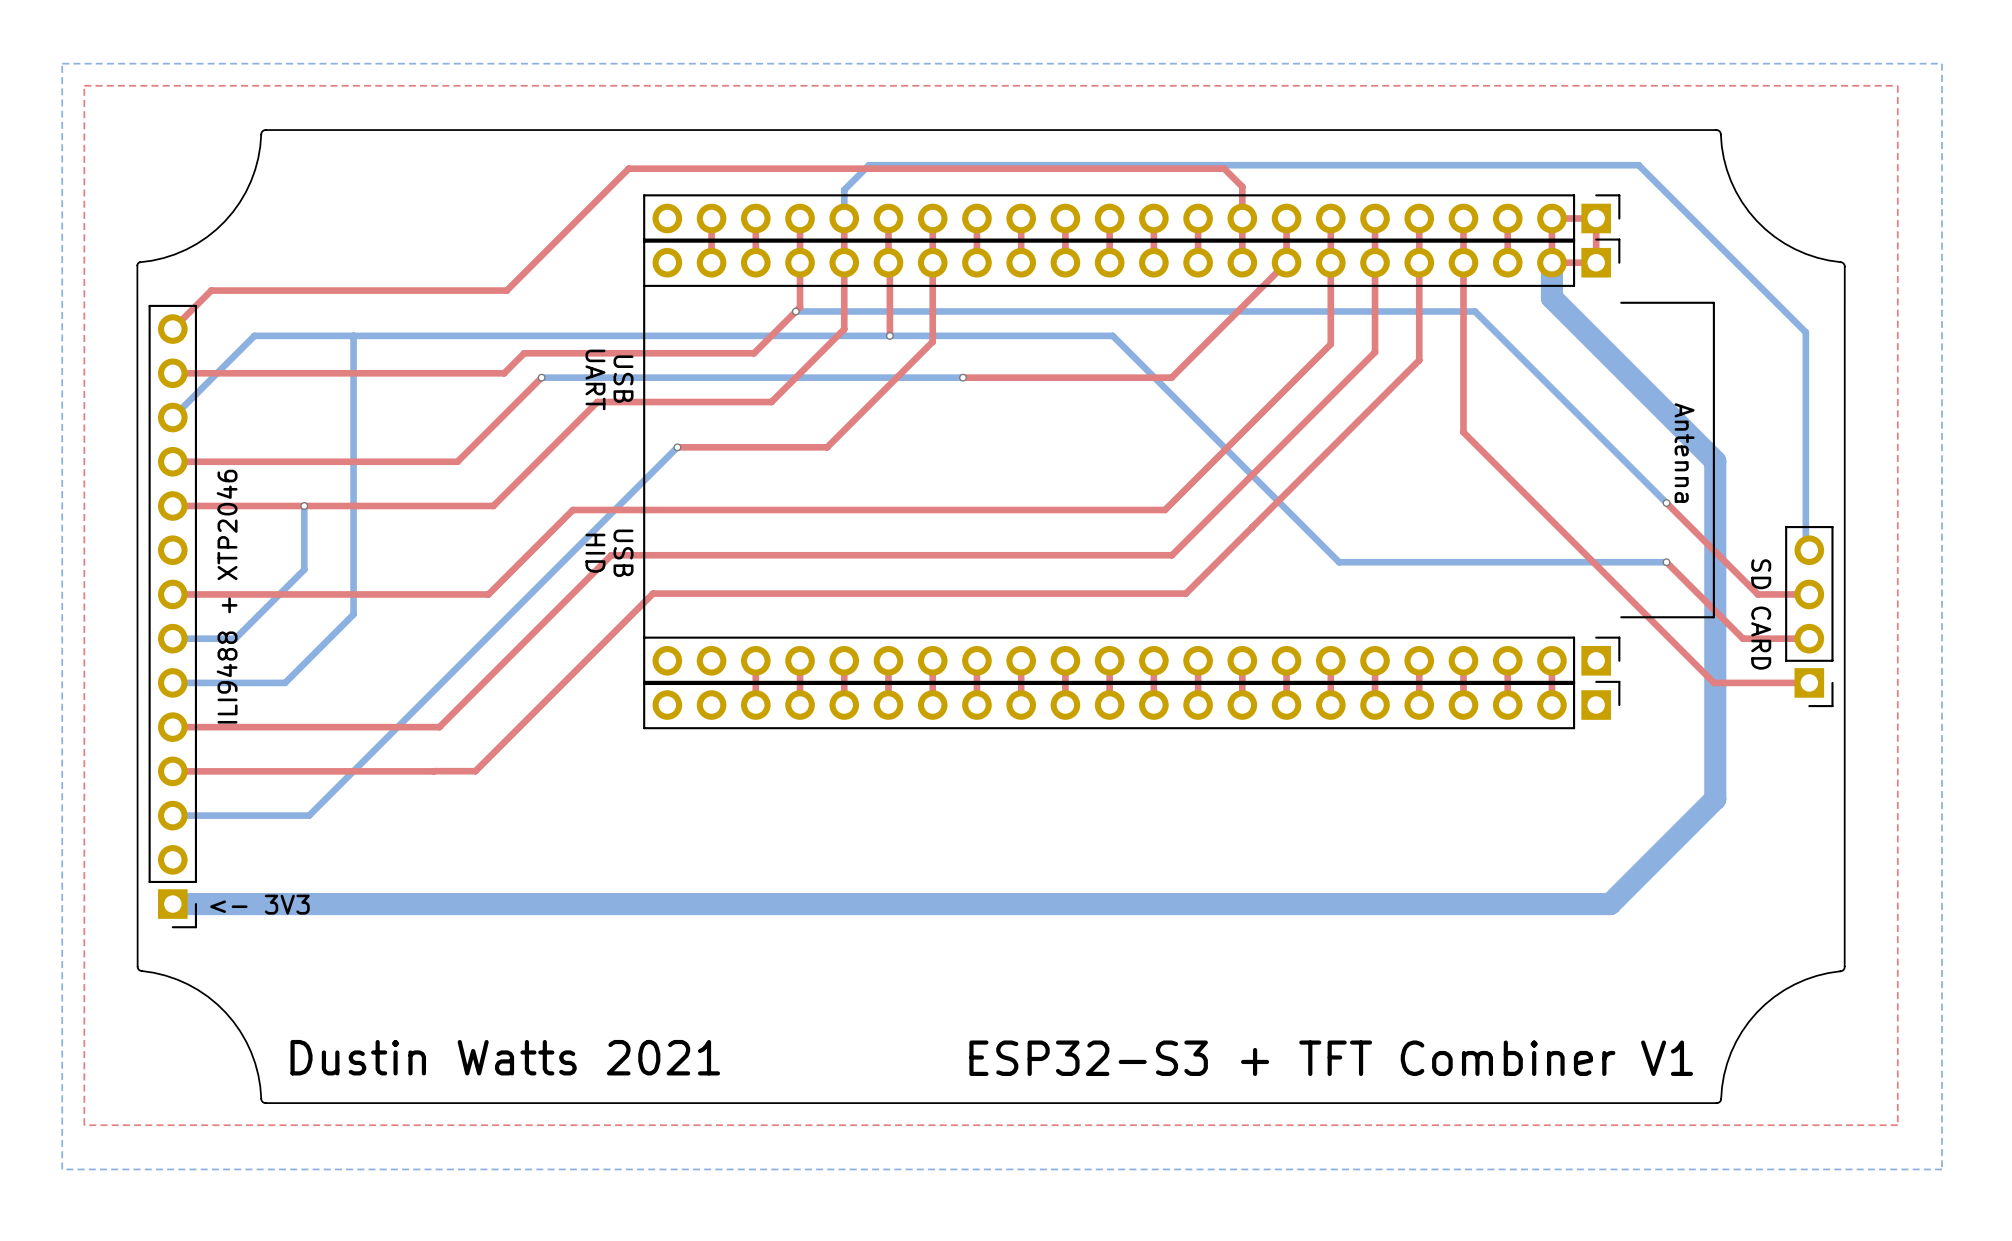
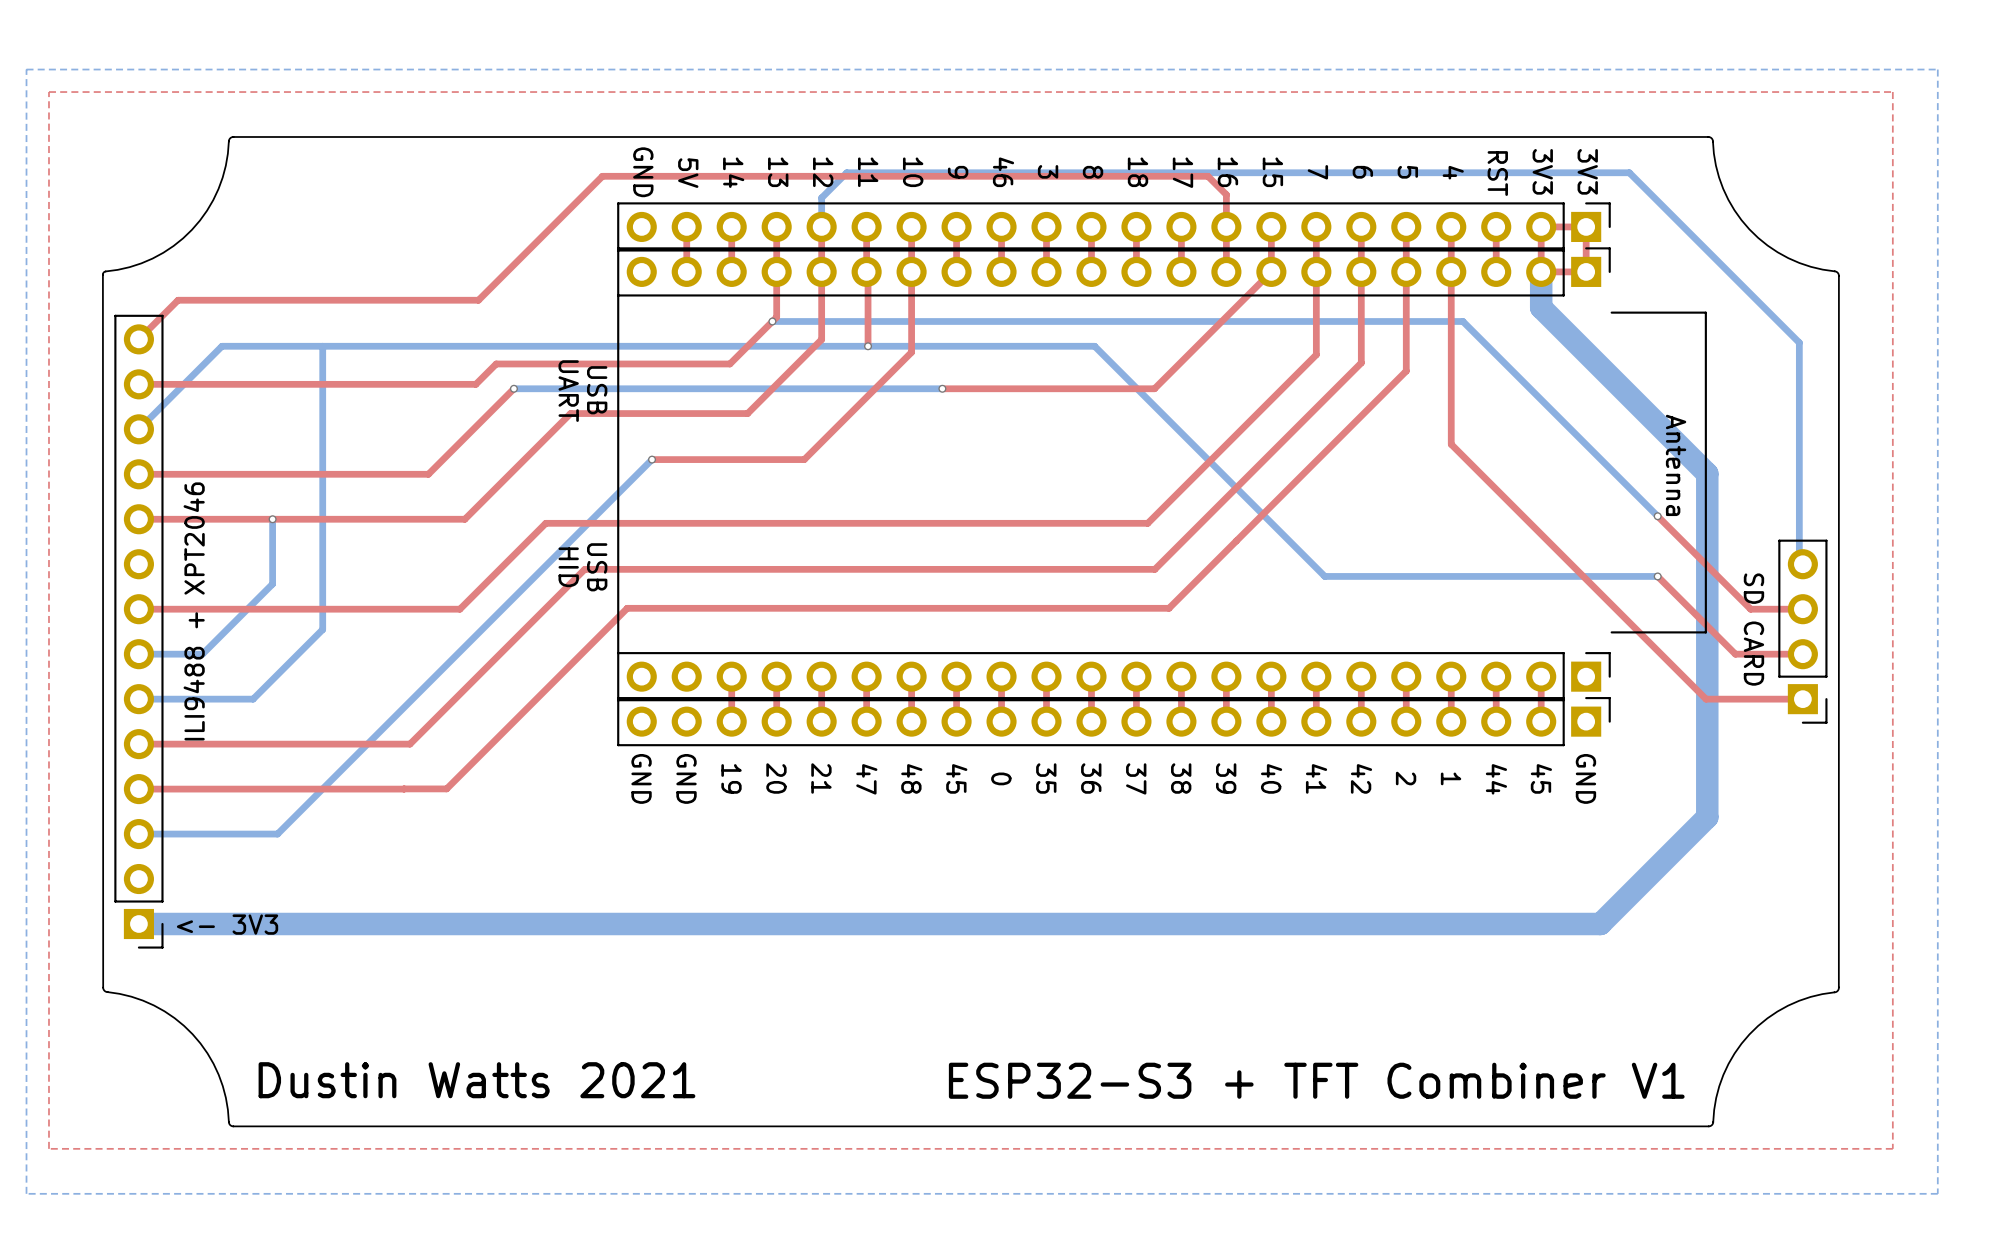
text: none -> GND (643, 172)
text: none -> 13 (778, 172)
text: none -> 12 (823, 172)
text: none -> 11 (868, 172)
text: none -> 10 (913, 172)
text: none -> 9 (958, 172)
text: none -> 46 (1003, 172)
text: none -> 3 (1048, 171)
text: none -> 8 (1093, 172)
text: none -> 18 (1138, 172)
text: none -> 16 (1227, 172)
text: none -> 15 (1272, 172)
text: none -> 7 (1317, 172)
text: none -> 6 (1362, 172)
text: none -> 5 (1407, 172)
text: none -> 3V3 (1542, 171)
text: none -> 3V3 (1587, 171)
text: none -> 5V (688, 173)
text: none -> 14 (733, 172)
text: none -> 17 (1182, 172)
text: none -> 4 (1453, 172)
text: none -> RST (1497, 173)
text: ILI9488 + XTP2046 (227, 596) -> ILI9488 + XPT2046 (194, 611)
text: none -> 20 (776, 778)
text: none -> 21 (821, 778)
text: none -> 35 (1046, 778)
text: none -> 36 (1091, 778)
text: none -> 38 (1181, 778)
text: none -> 39 (1226, 778)
text: none -> 2 (1406, 778)
text: none -> GND (641, 778)
text: none -> GND (686, 778)
text: none -> 19 (731, 778)
text: none -> 47 (866, 779)
text: none -> 48 (911, 778)
text: none -> 45 (956, 778)
text: none -> 0 (1001, 778)
text: none -> 37 (1136, 778)
text: none -> 40 (1271, 778)
text: none -> 41 (1316, 778)
text: none -> 42 (1361, 778)
text: none -> 1 (1451, 778)
text: none -> 44 (1496, 779)
text: none -> 45 (1541, 778)
text: none -> GND (1585, 778)

